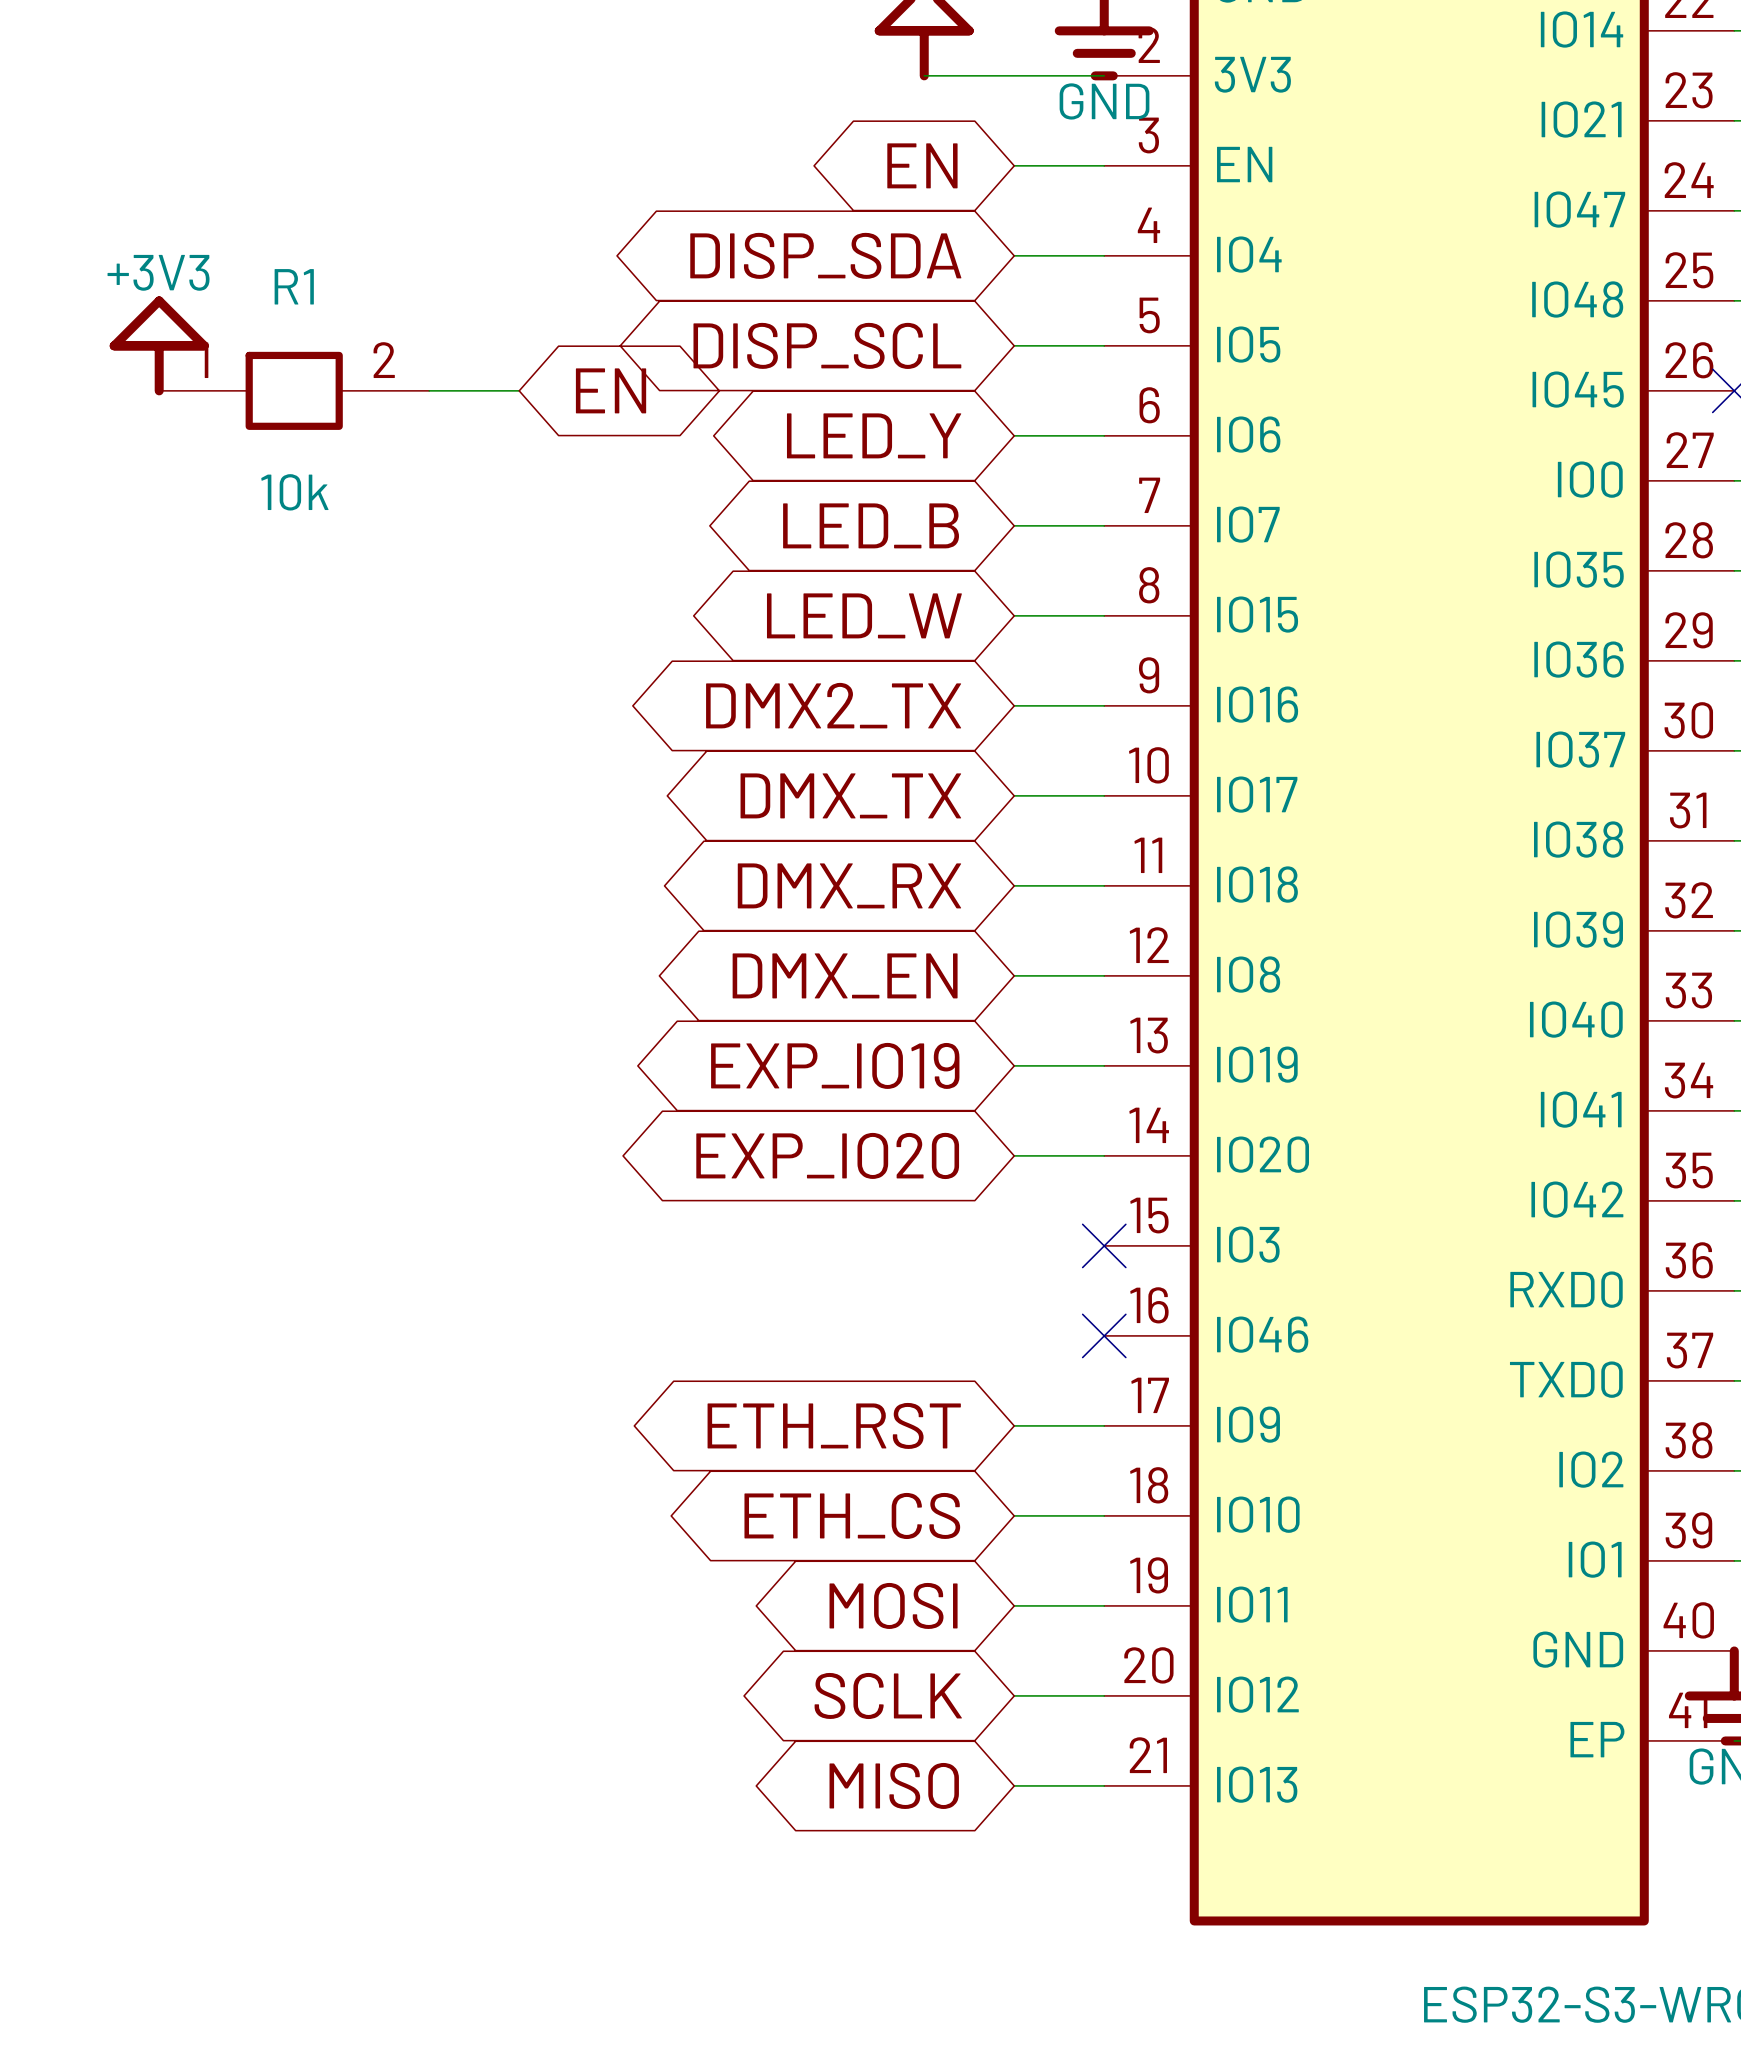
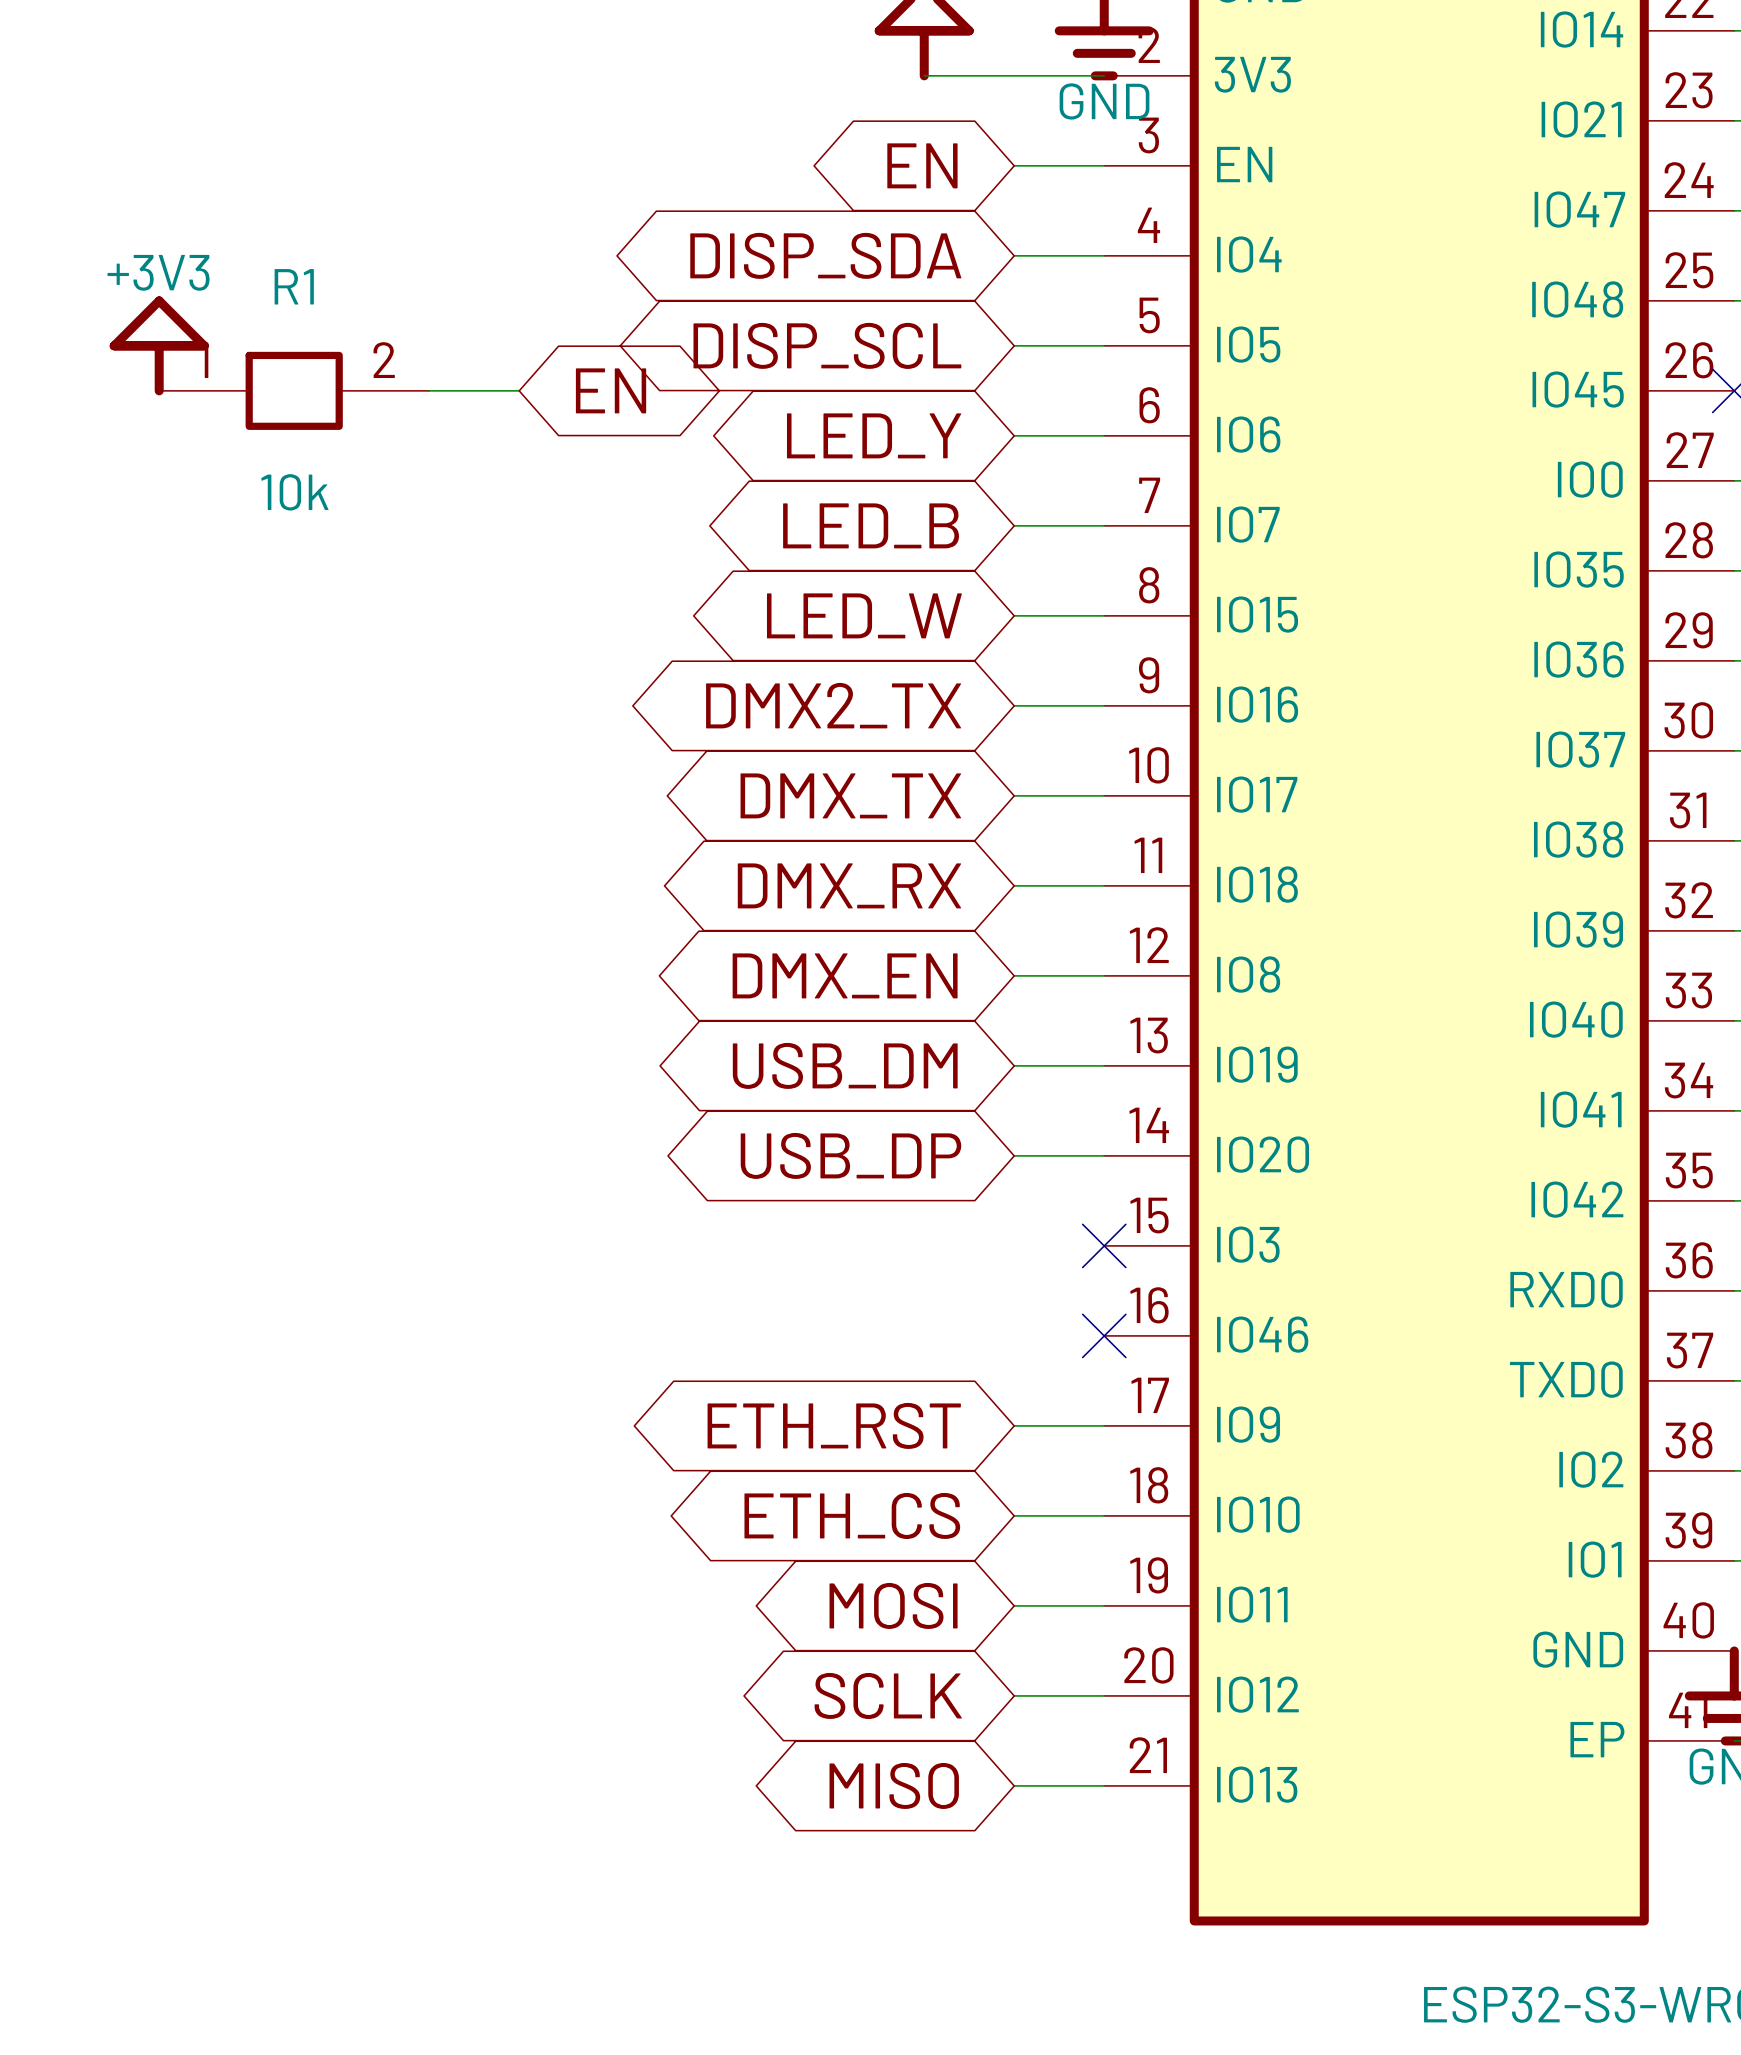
global label: EXP_IO19 (835, 1065) -> USB_DM (845, 1065)
global label: EXP_IO20 (827, 1155) -> USB_DP (850, 1155)

